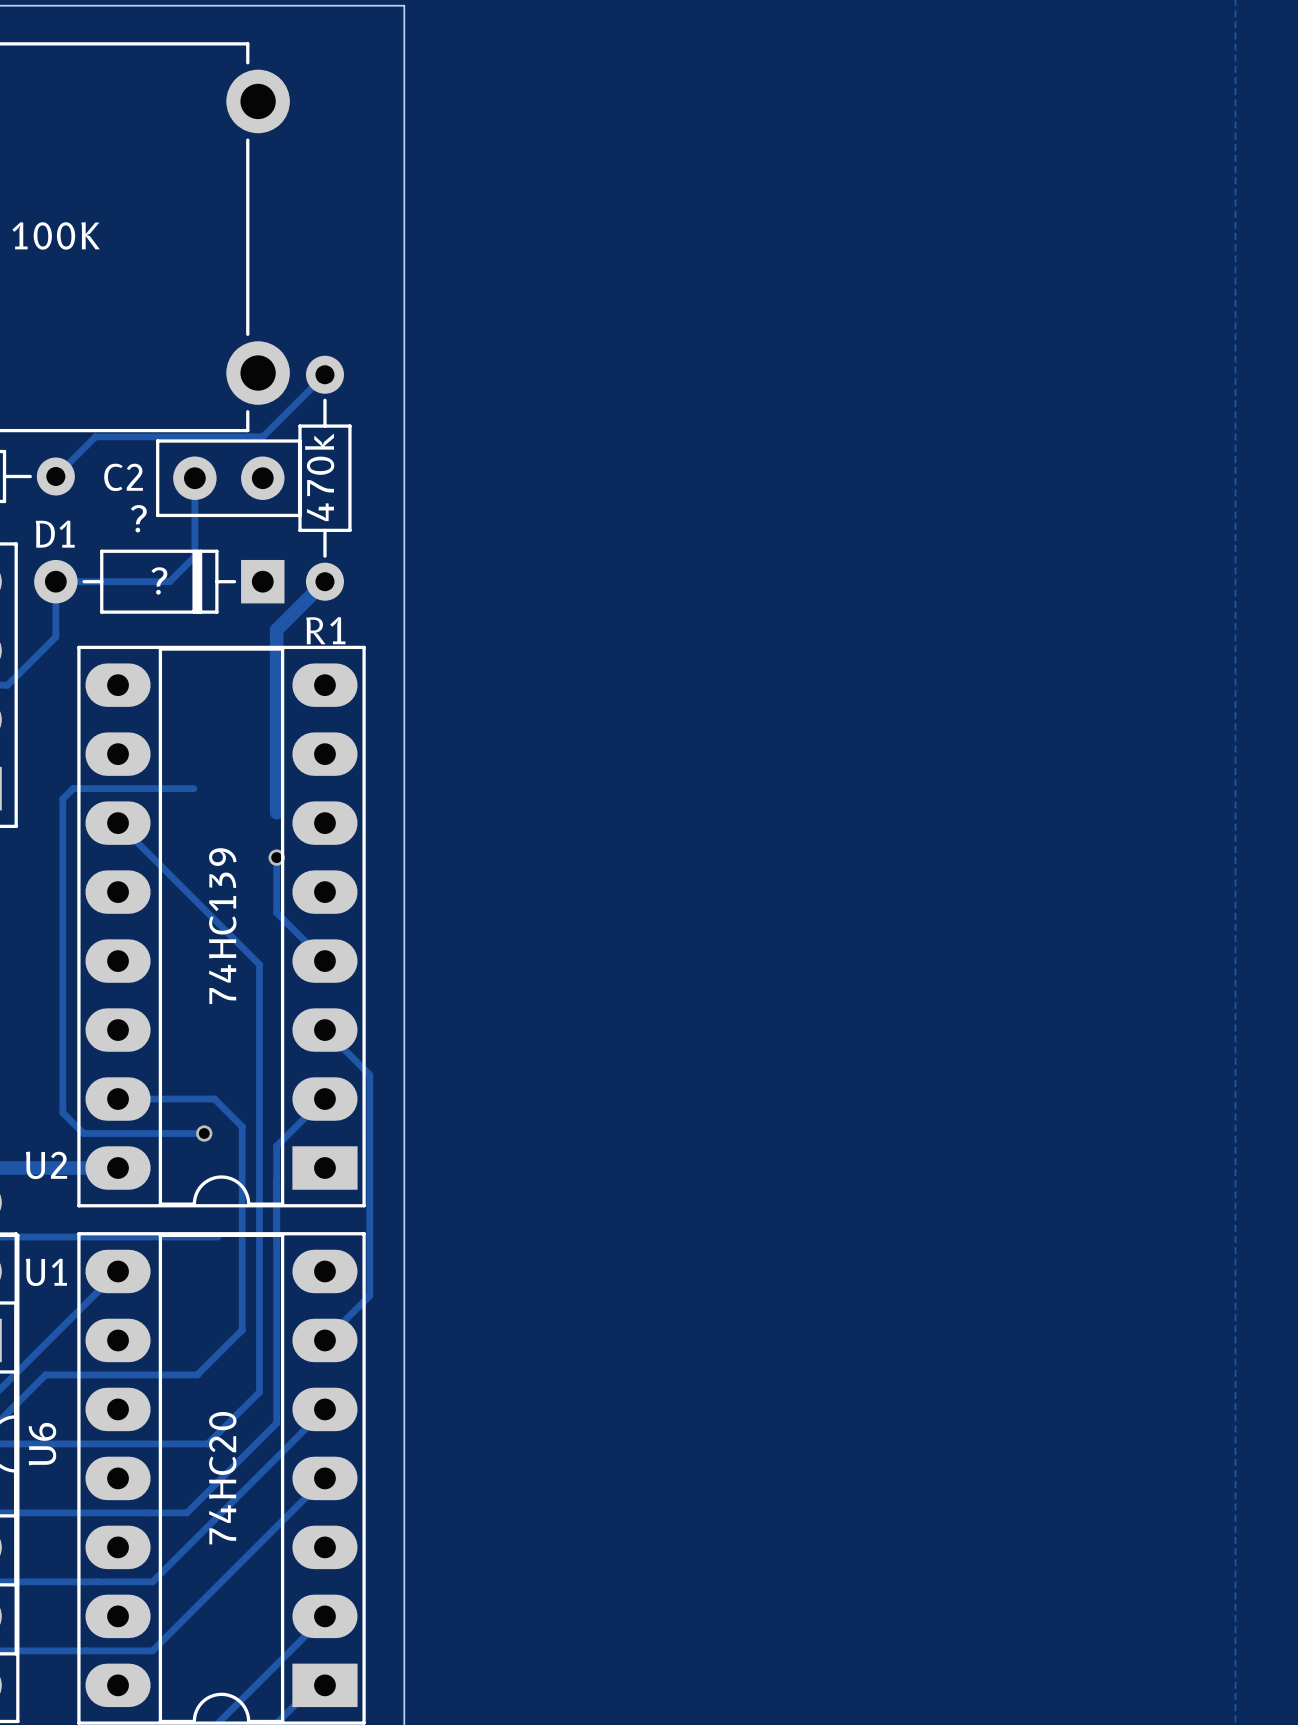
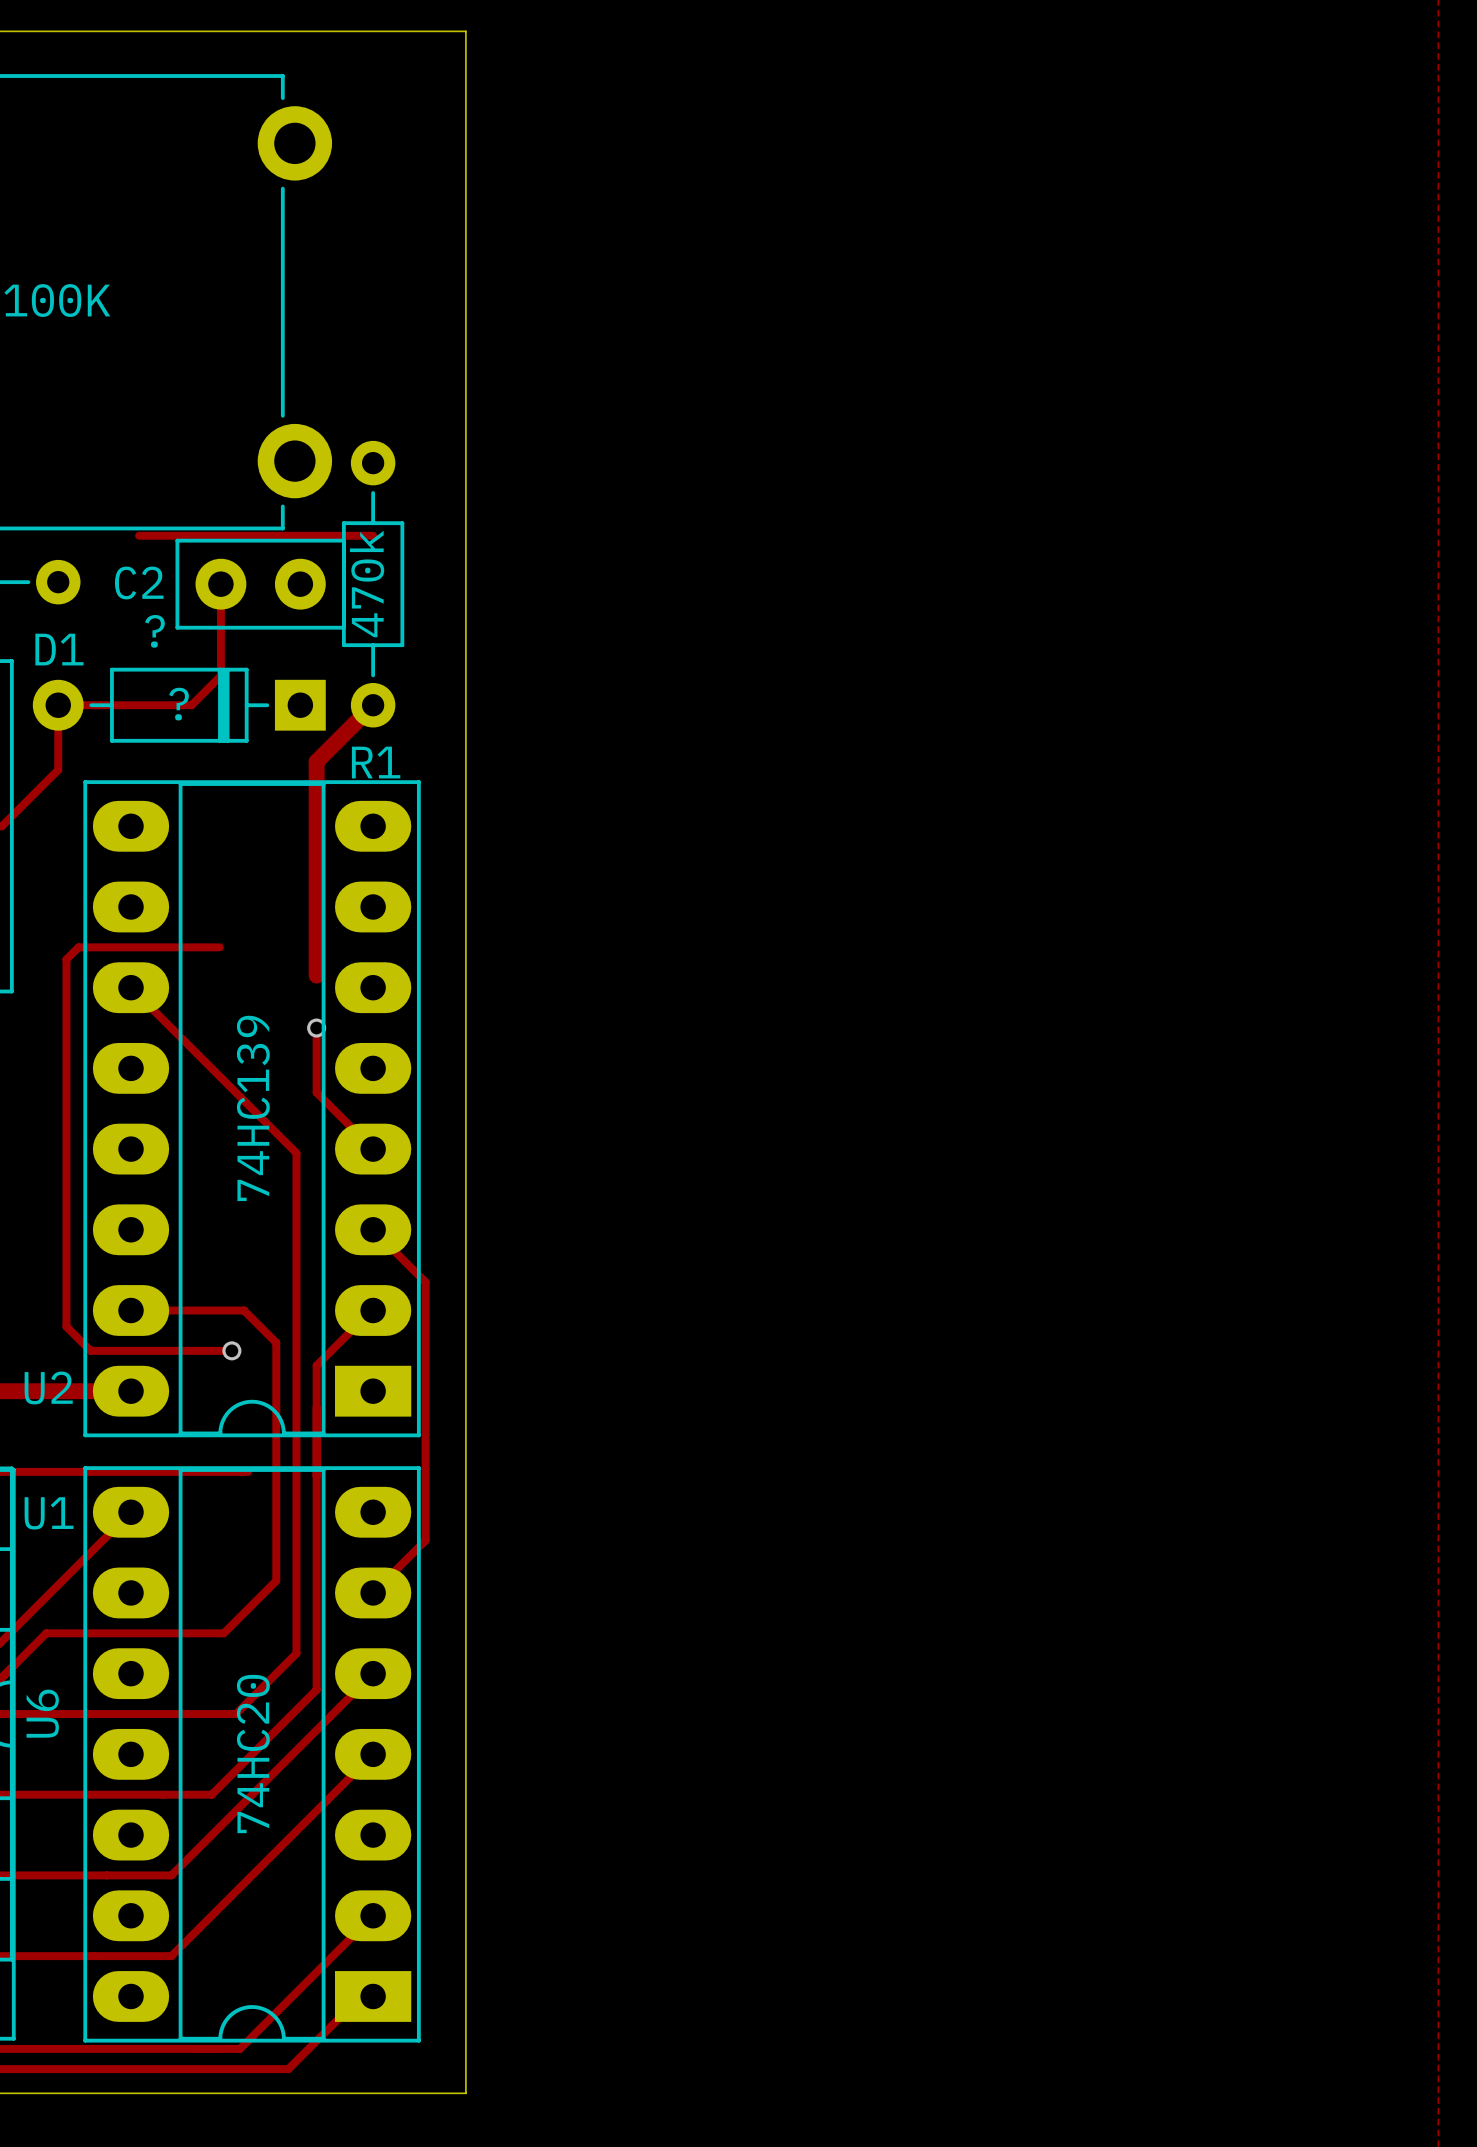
track: (324, 374) (262, 436) -> (373, 535) (300, 535)
track: (124, 436) (95, 436) (55, 476) -> none

